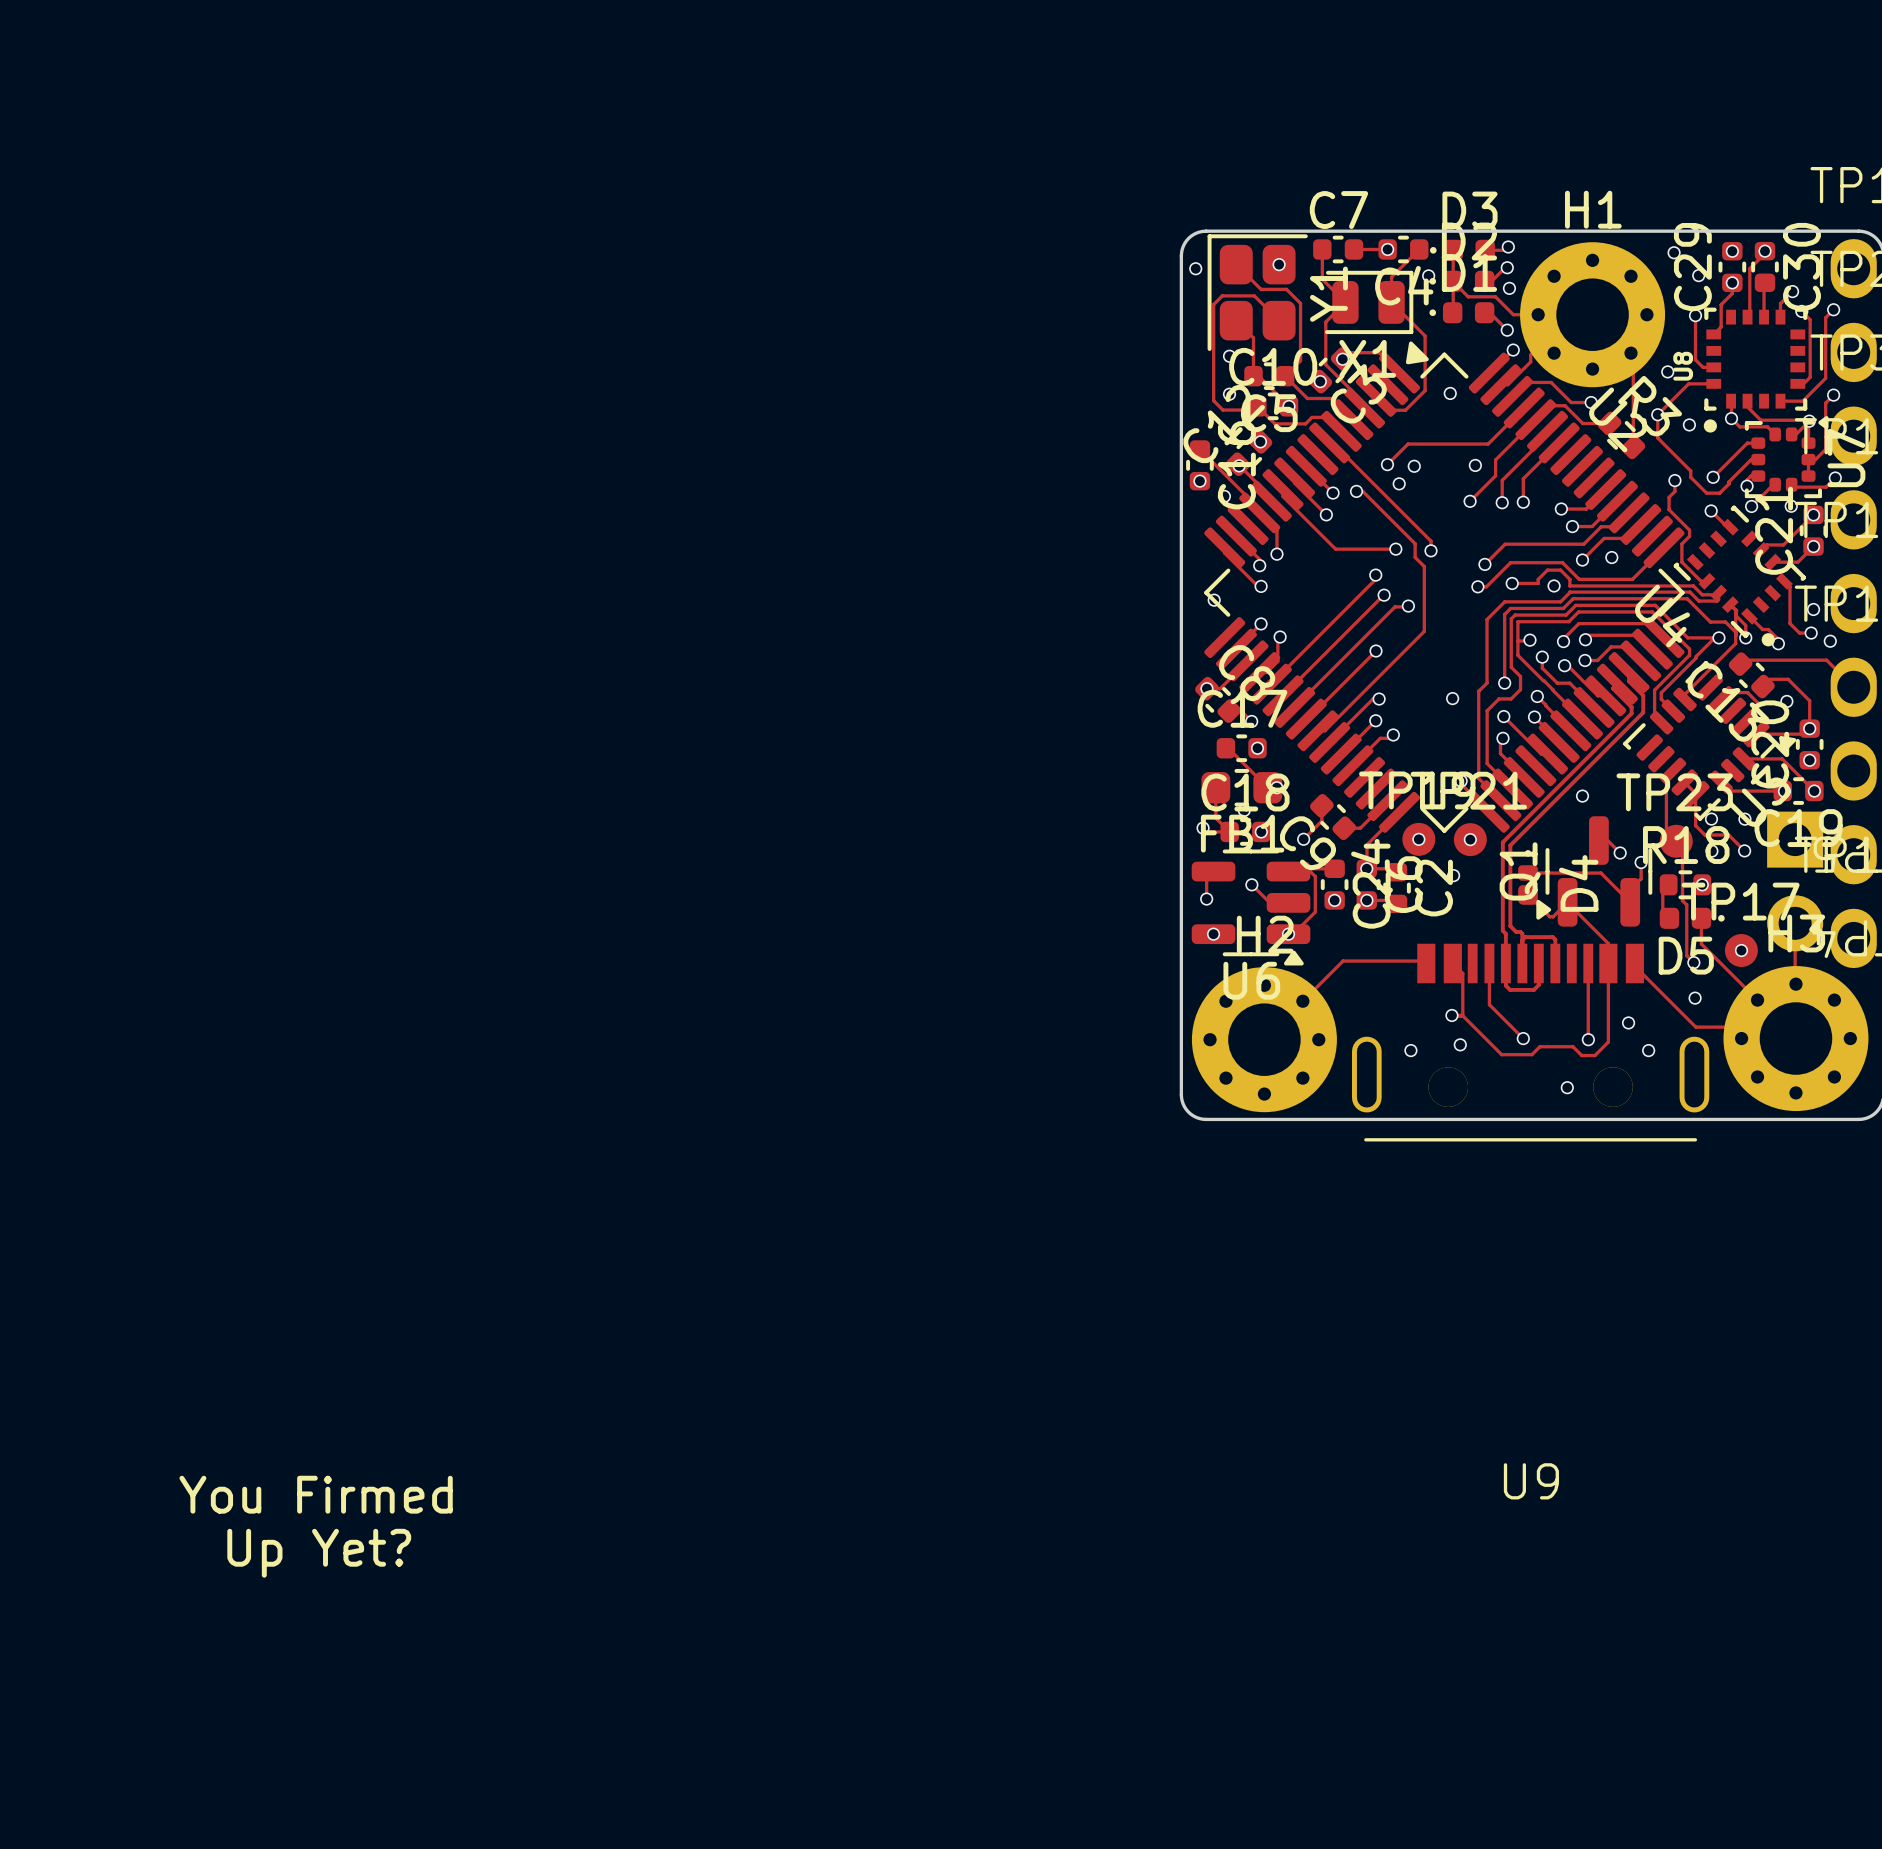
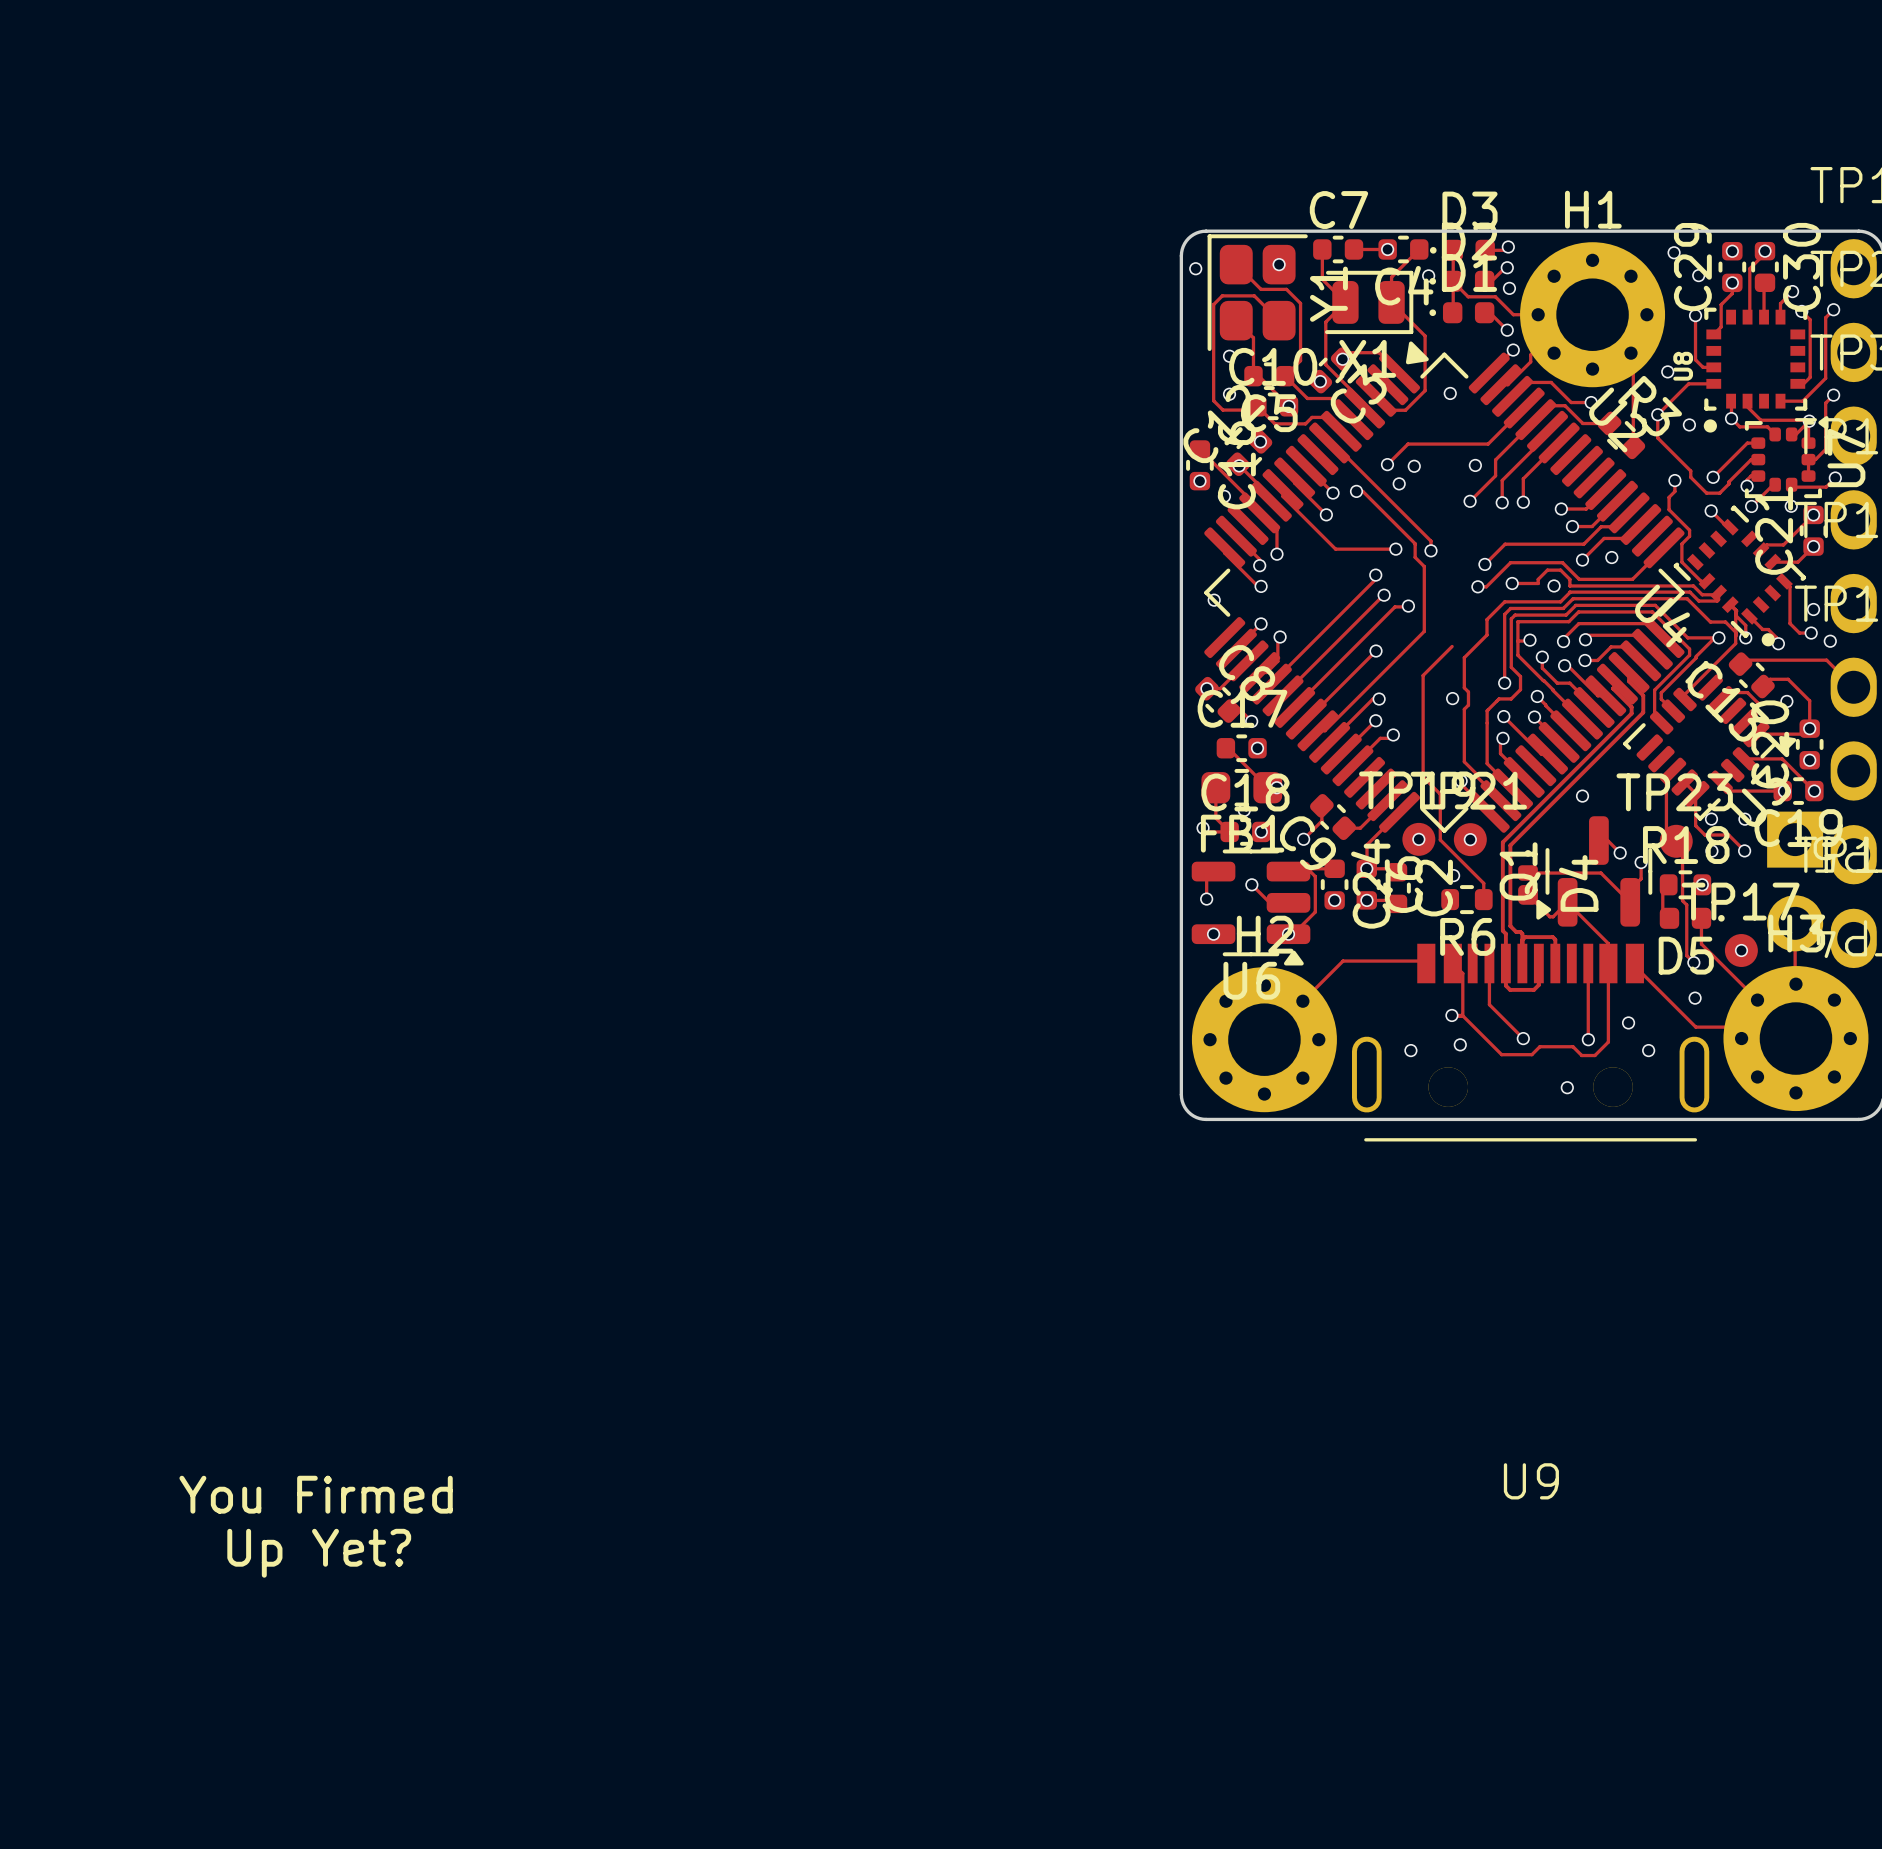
track: (1487, 635) (1487, 683) (1478, 691) (1478, 778) -> (1487, 635) (1464, 657) (1464, 687) (1468, 692) (1468, 705) (1464, 709) (1464, 761) (1478, 778)
track: none -> (1452, 646) (1423, 675) (1423, 777) (1440, 794) (1440, 839) (1483, 883) (1483, 899)
R6: none -> (1466, 899)

